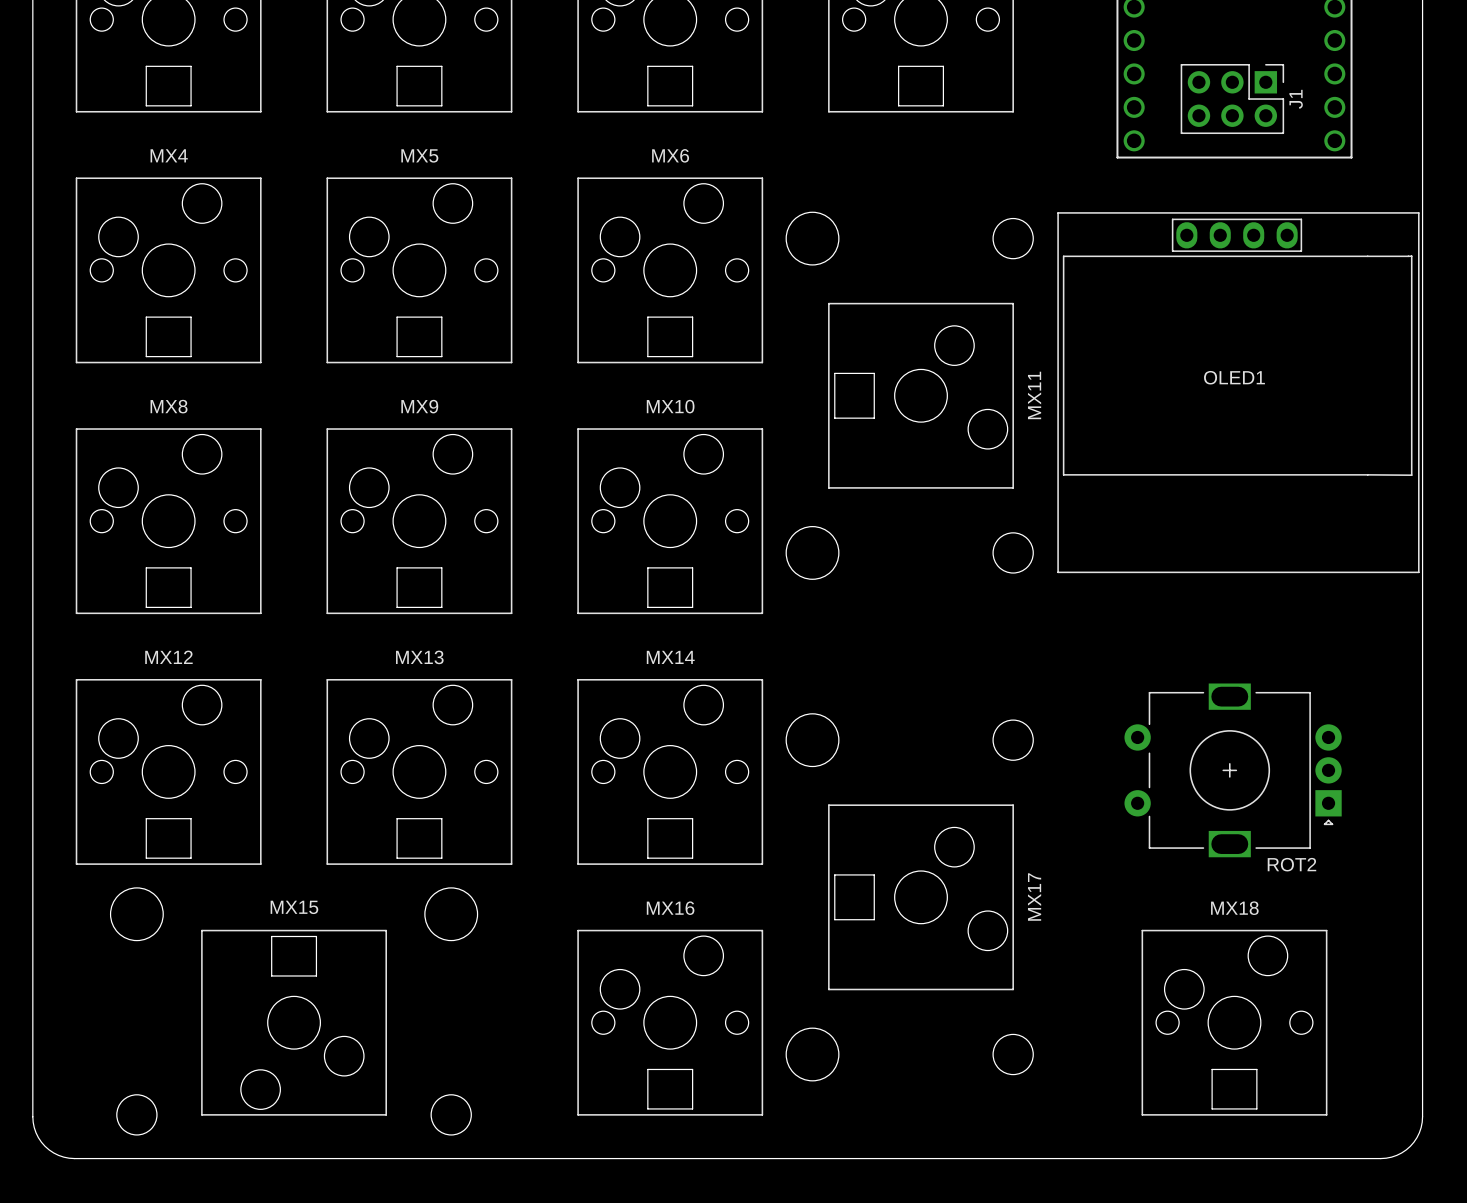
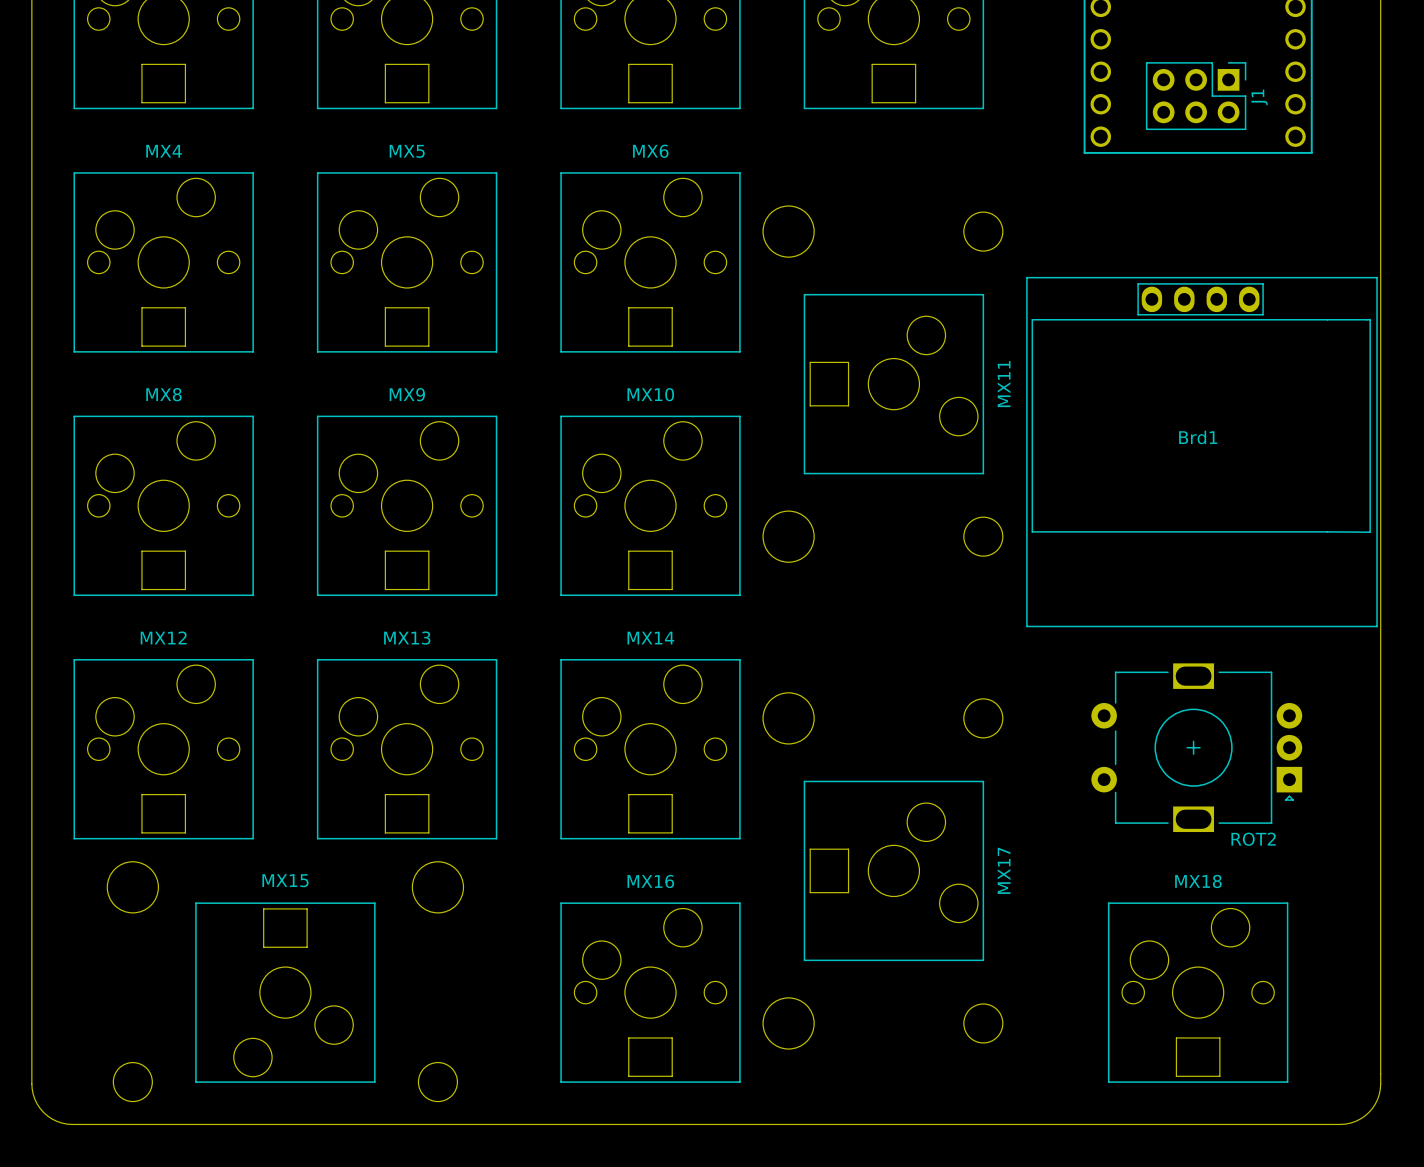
OLED1: (1238, 392) -> none
Brd1: none -> (1201, 452)

